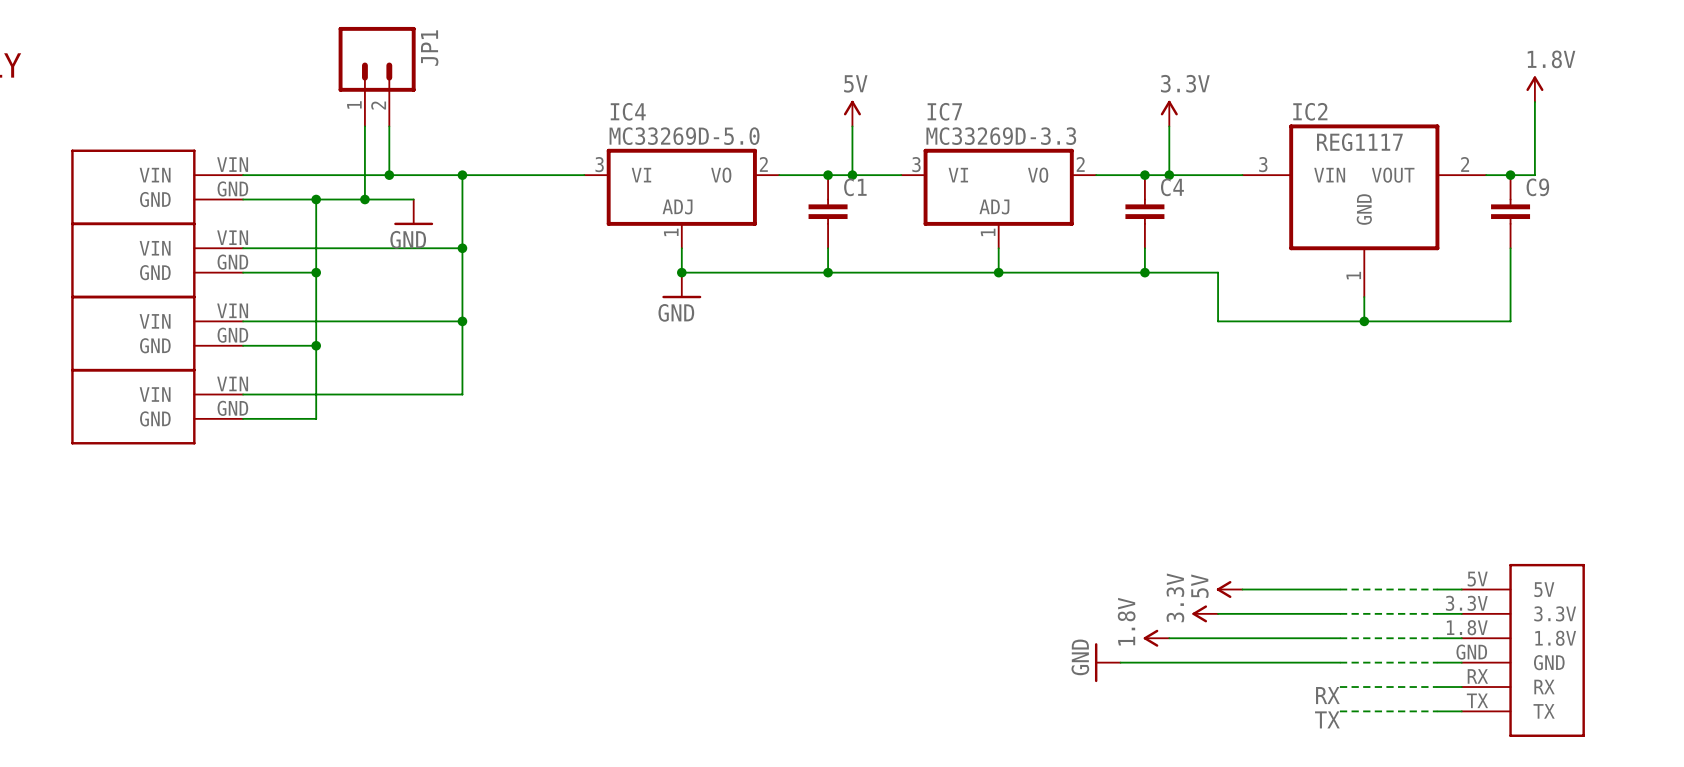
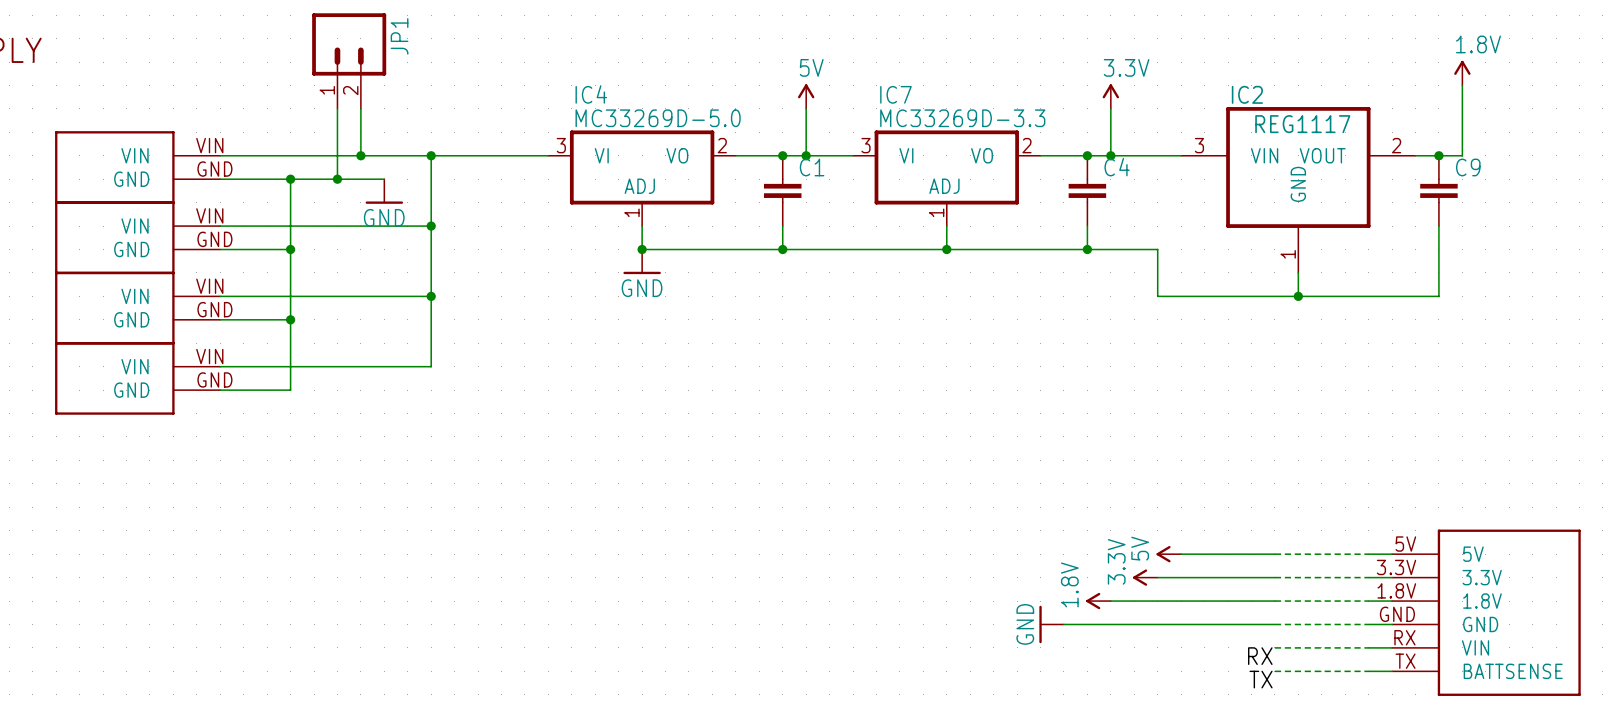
part: (1523, 650) -> none
part: none -> (1486, 612)

